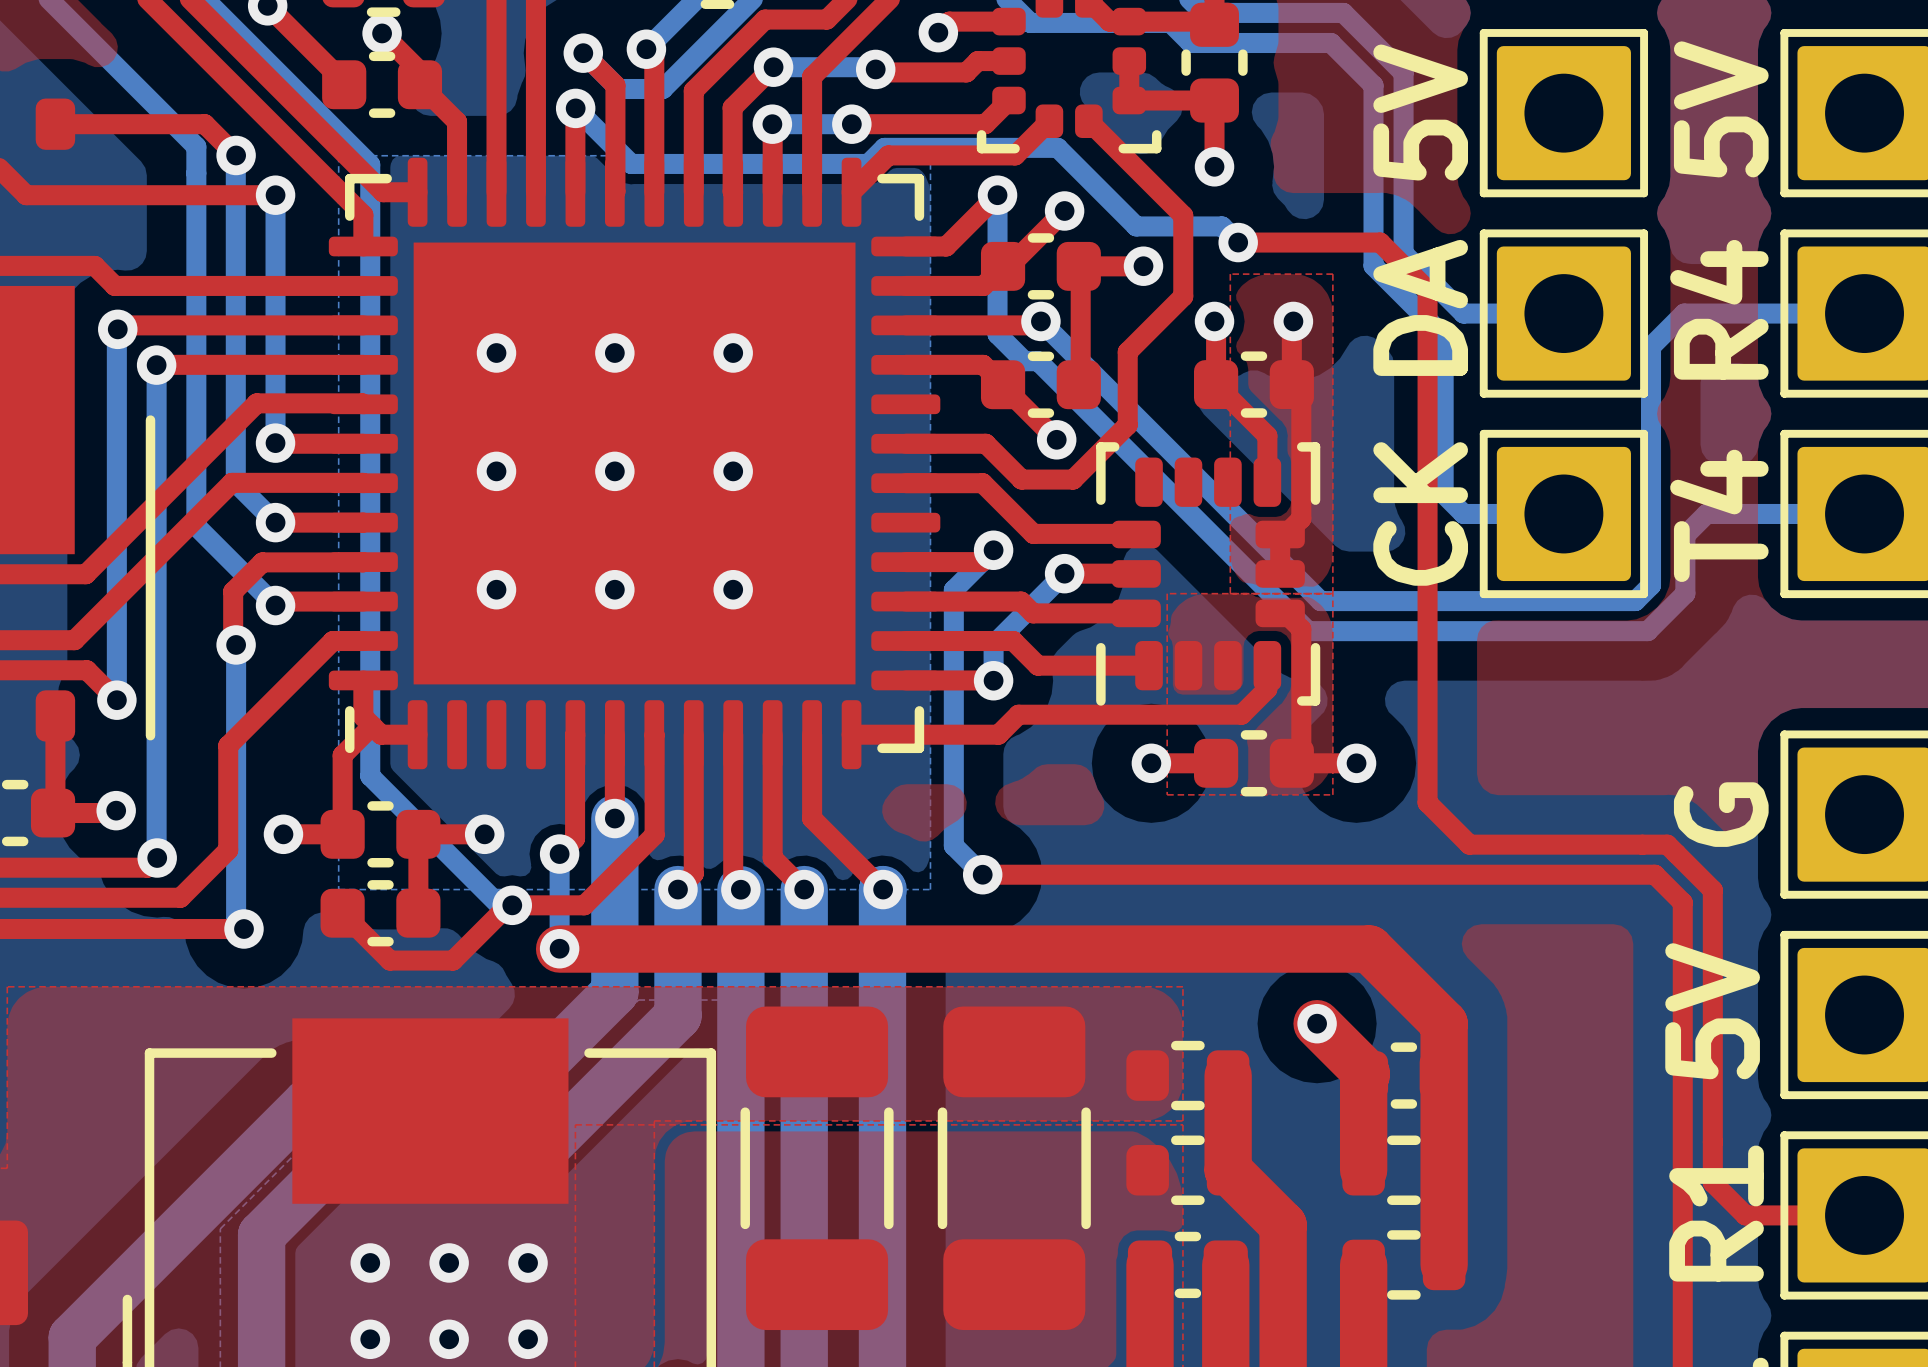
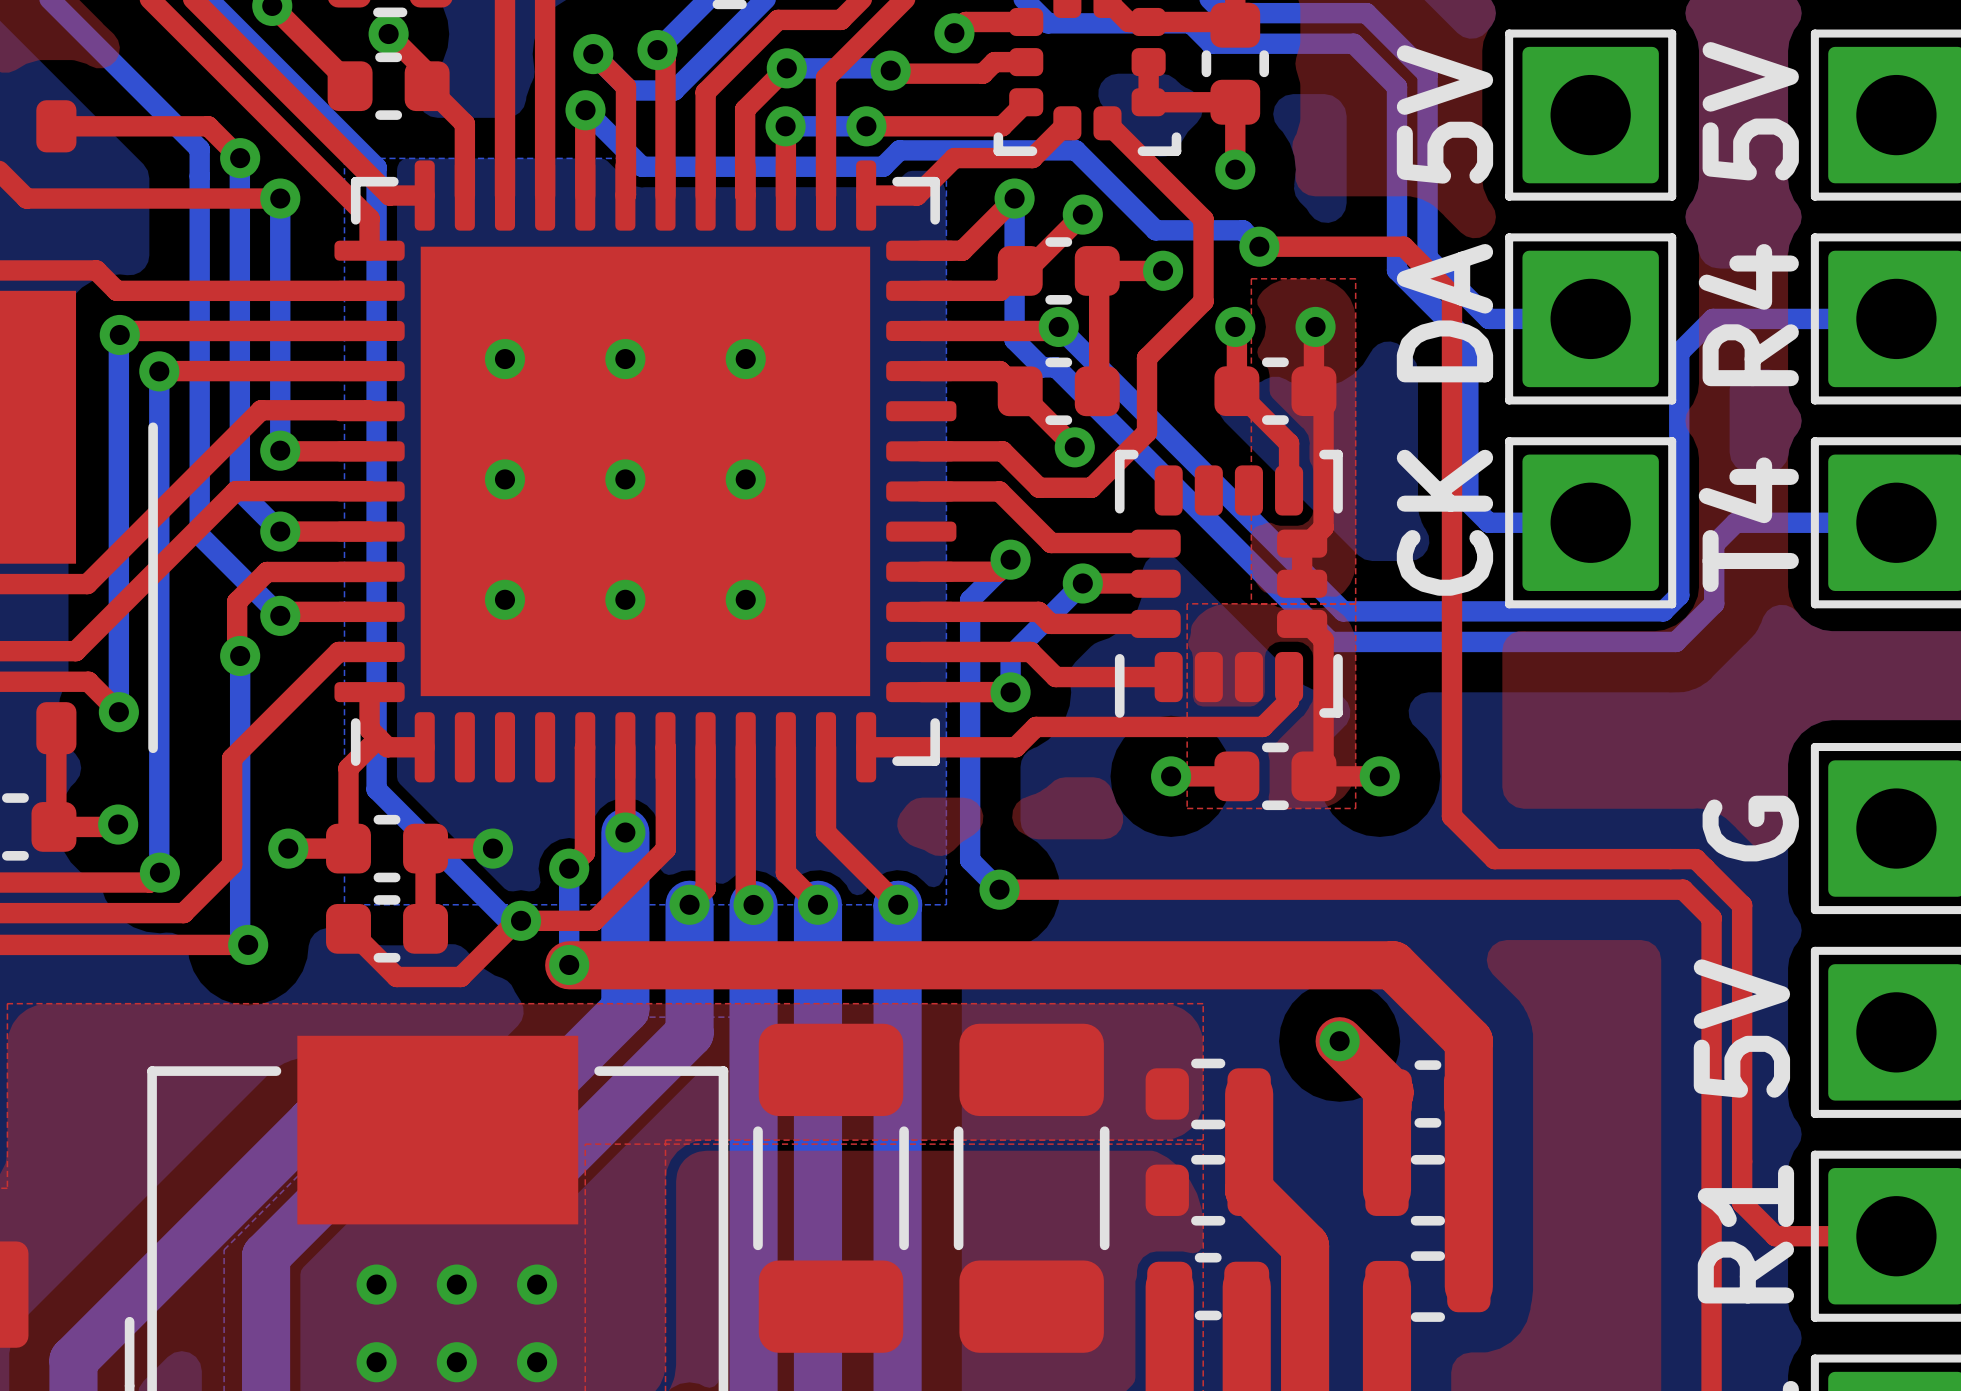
top track: (938, 155) (888, 155) (851, 192) -> (954, 158) (916, 195) (866, 195)

